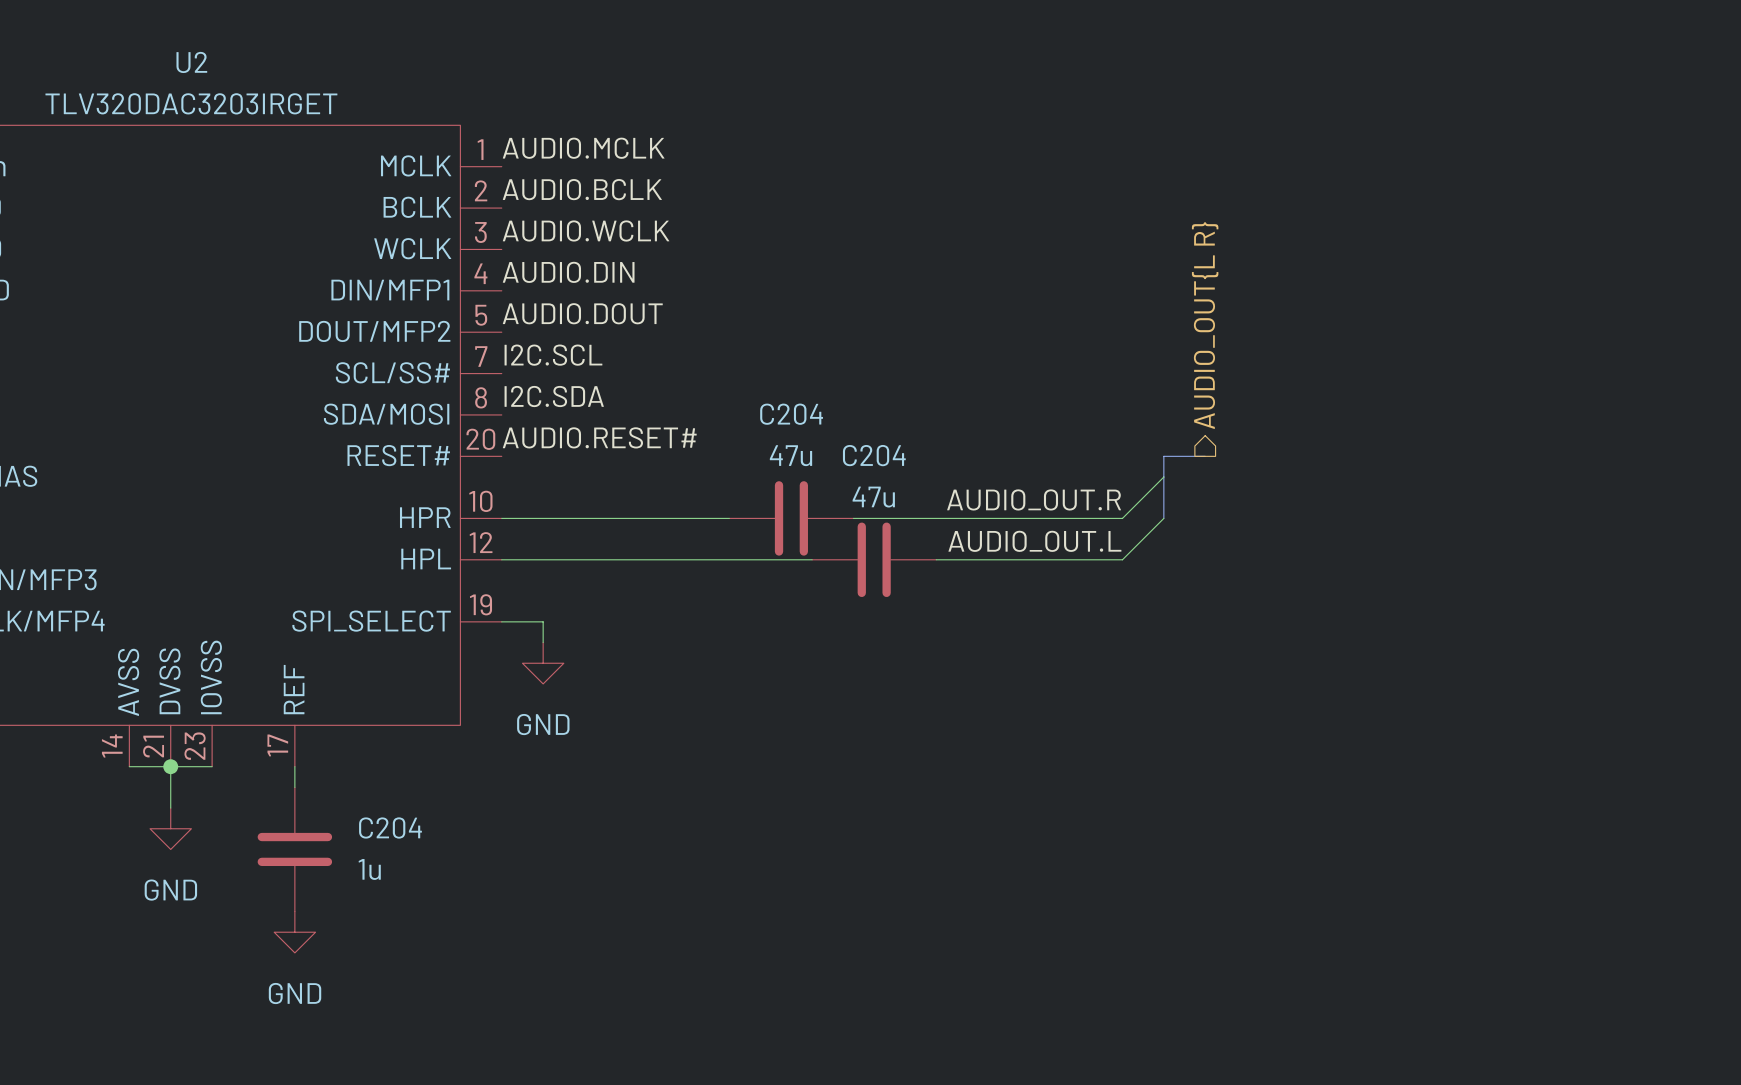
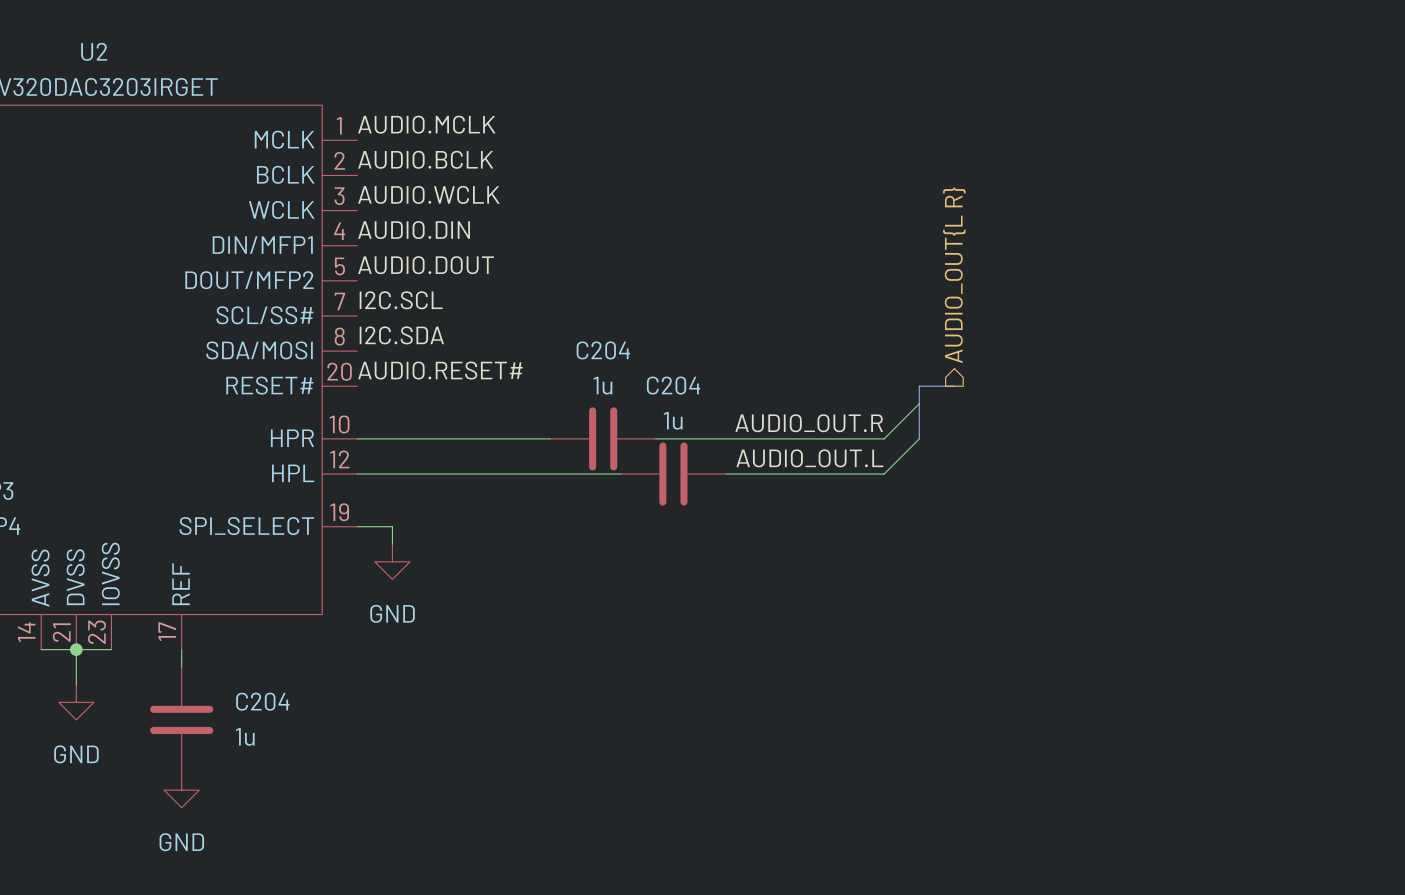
C204 value: 47u (790, 455) -> 1u (602, 385)
C204 value: 47u (873, 497) -> 1u (673, 420)

